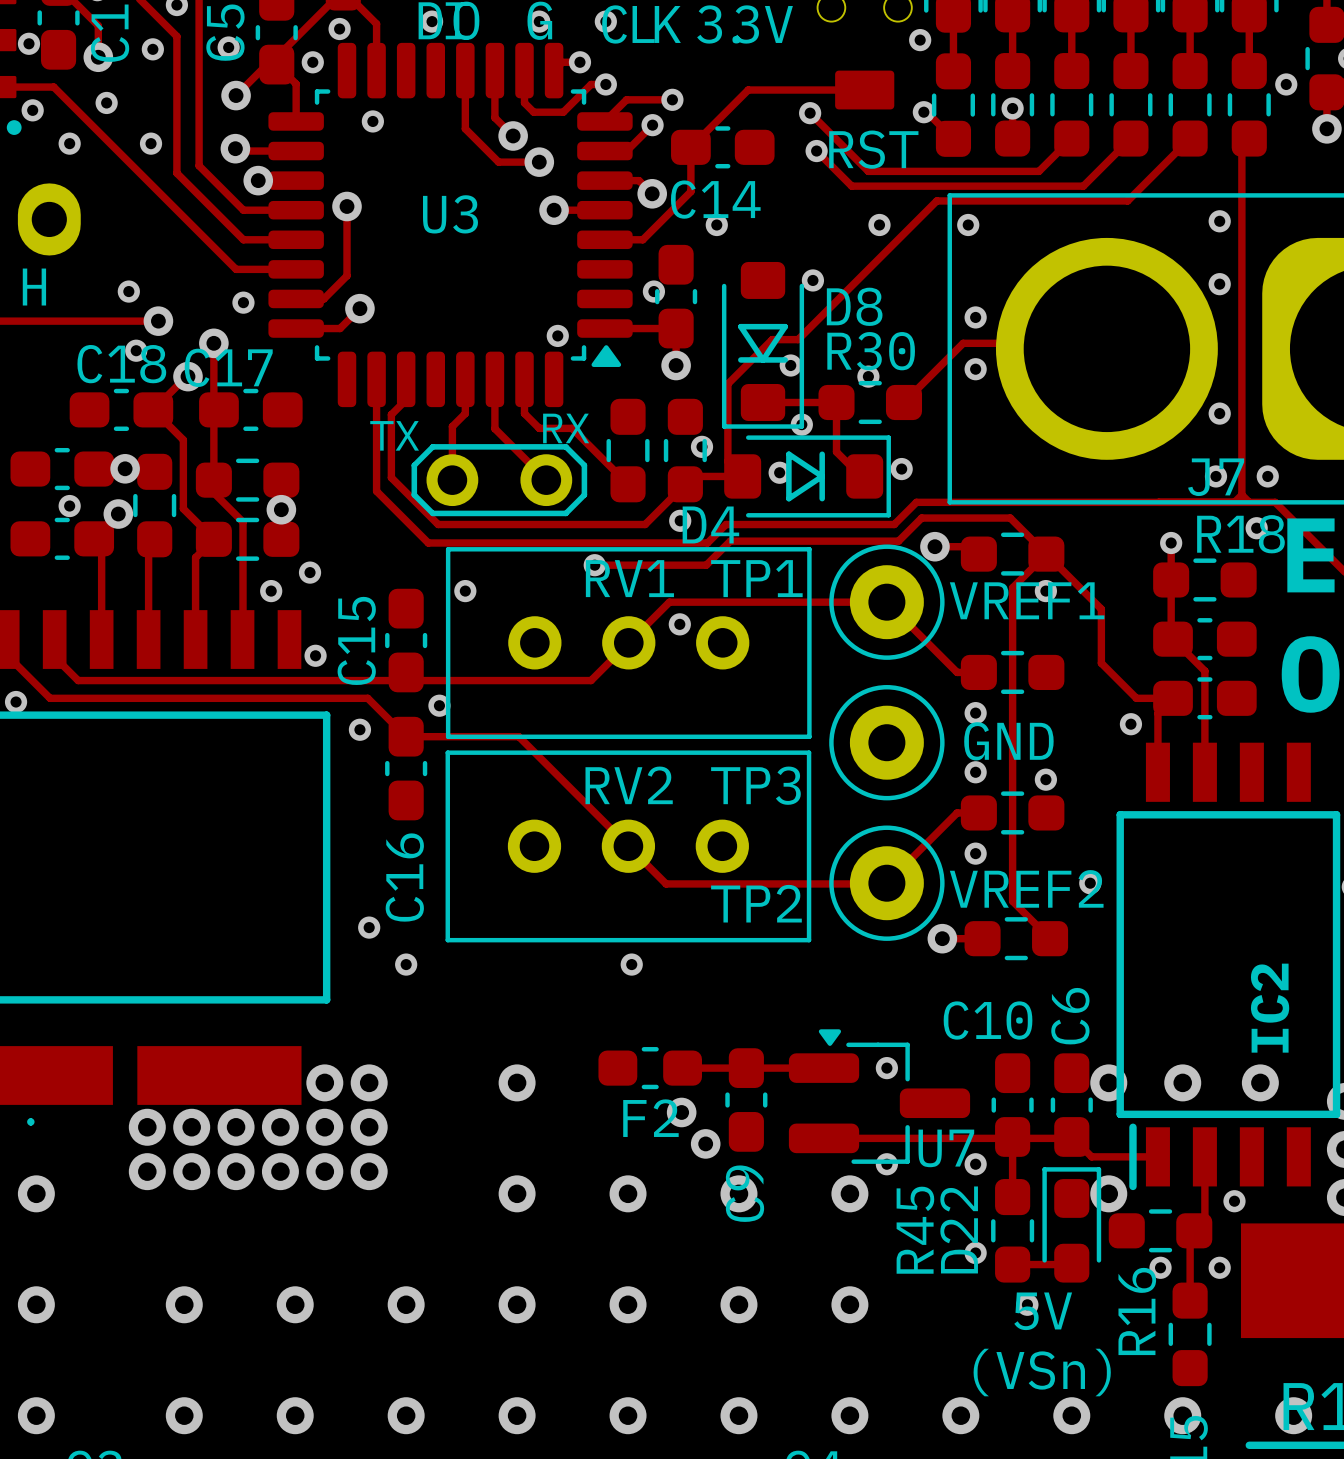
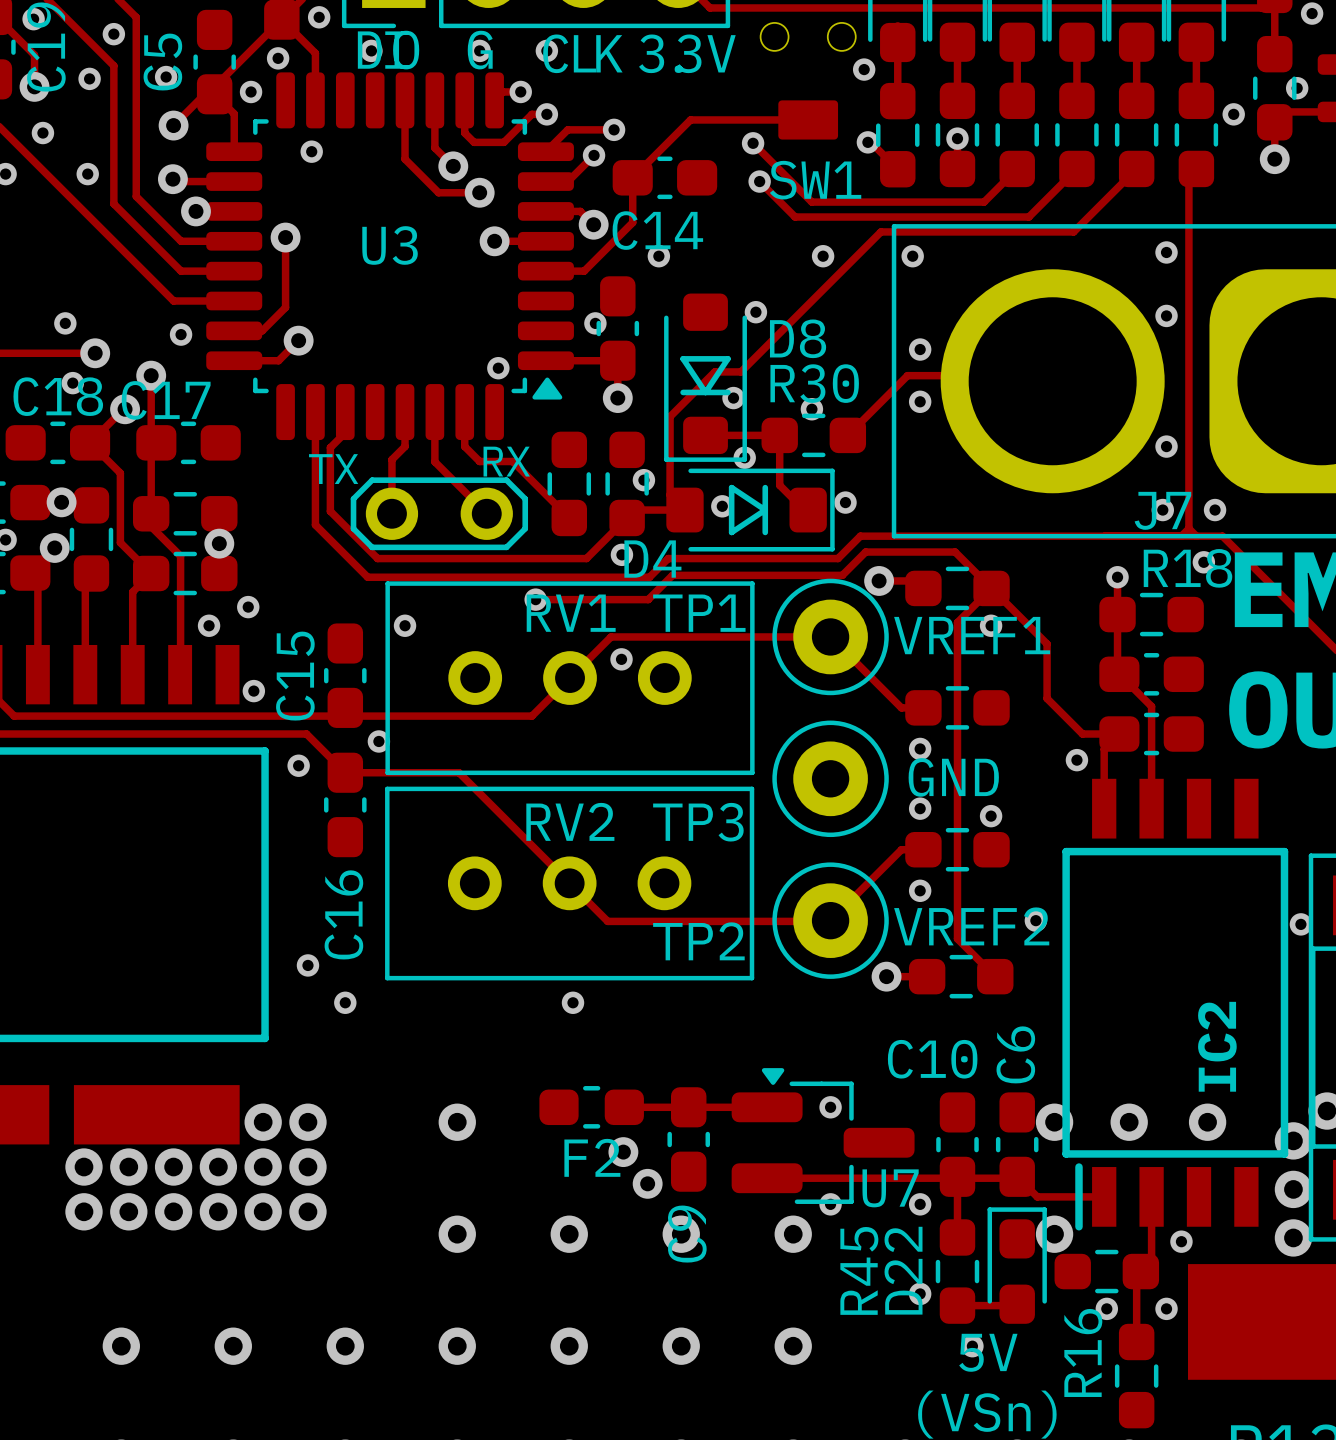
RST name: RST (873, 149) -> SW1 (815, 180)

